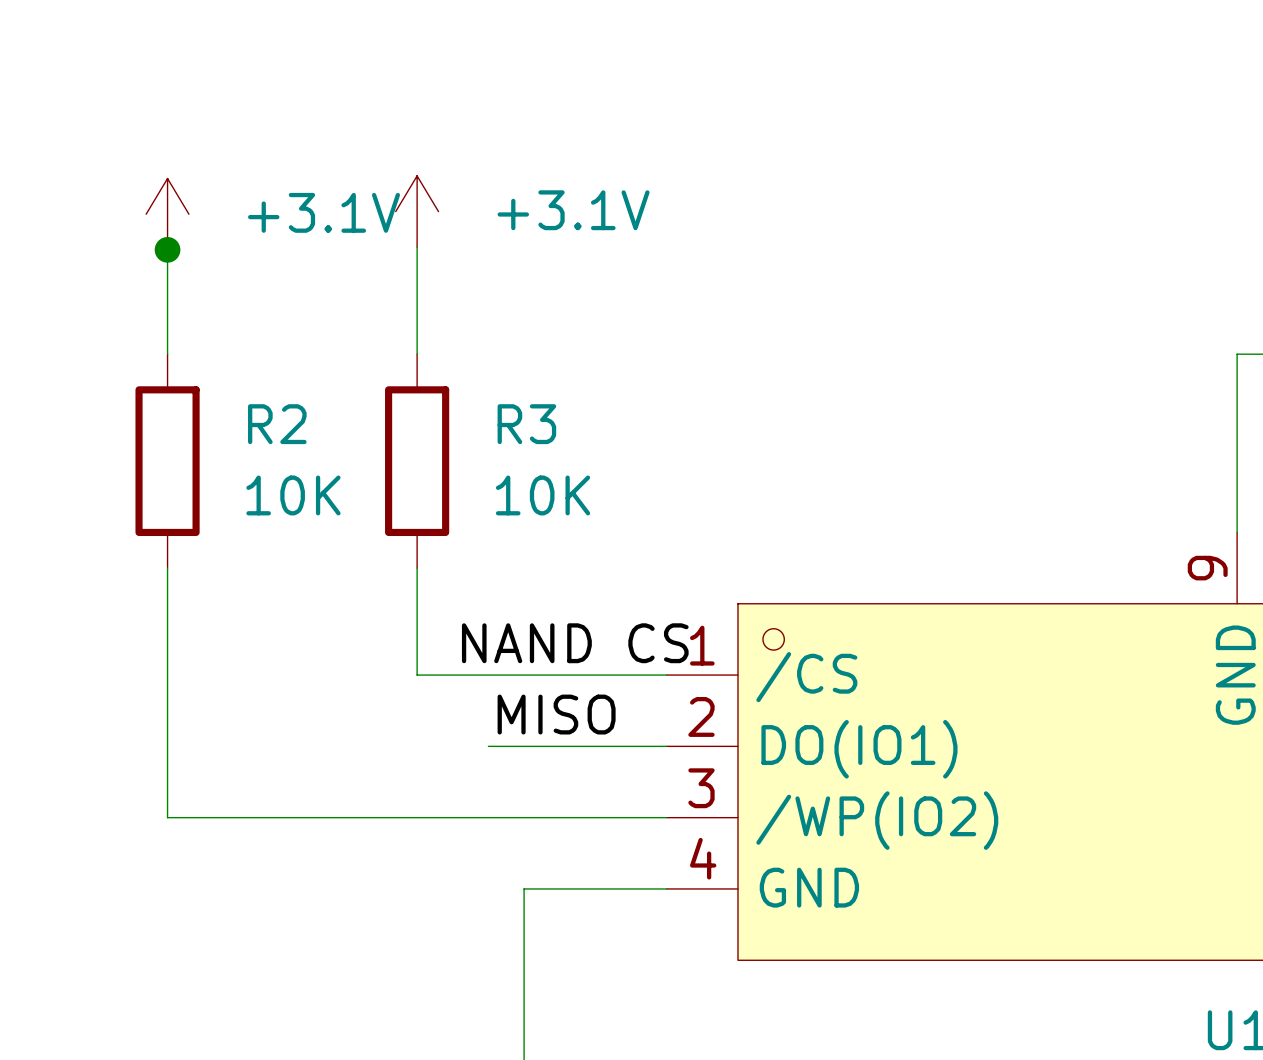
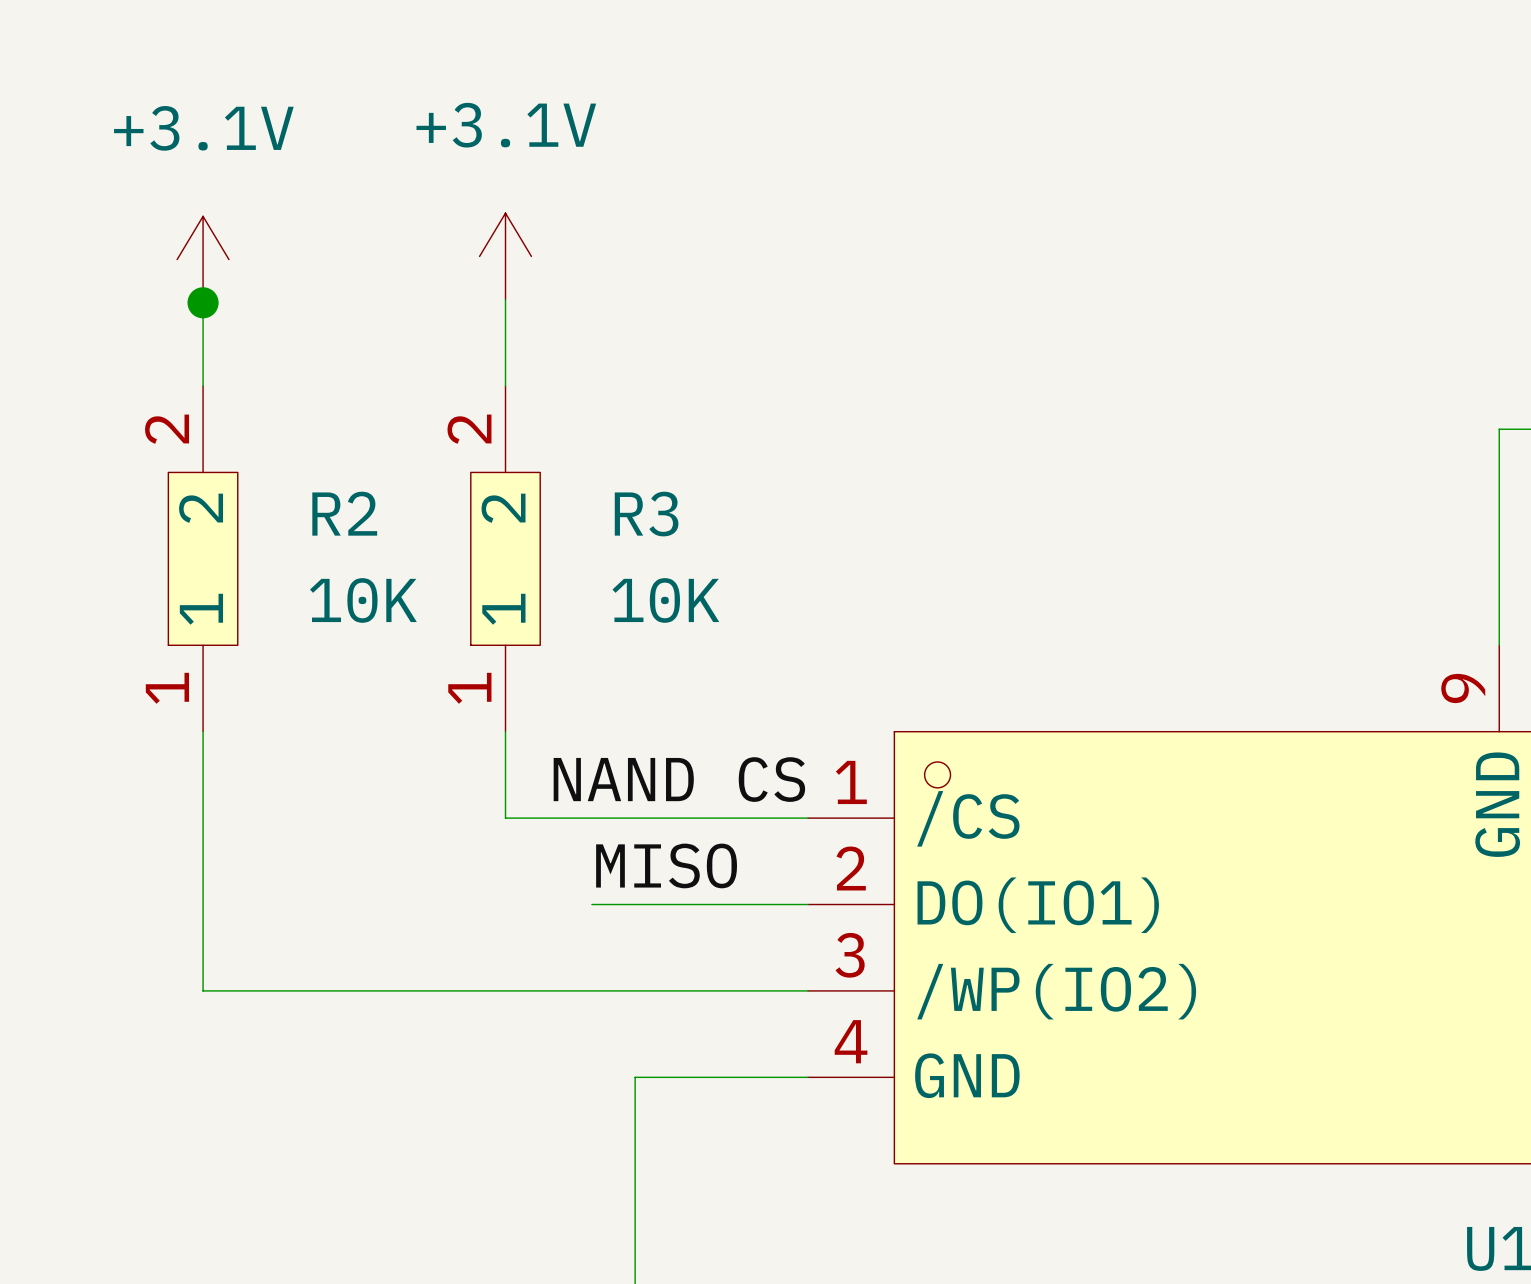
power symbol text position: +3.1V (573, 210) -> +3.1V (506, 125)
power symbol text position: +3.1V (324, 212) -> +3.1V (203, 128)
R2 symbol: [135, 354, 200, 569] -> [168, 386, 238, 732]
R3 symbol: [385, 354, 450, 569] -> [470, 386, 541, 732]

